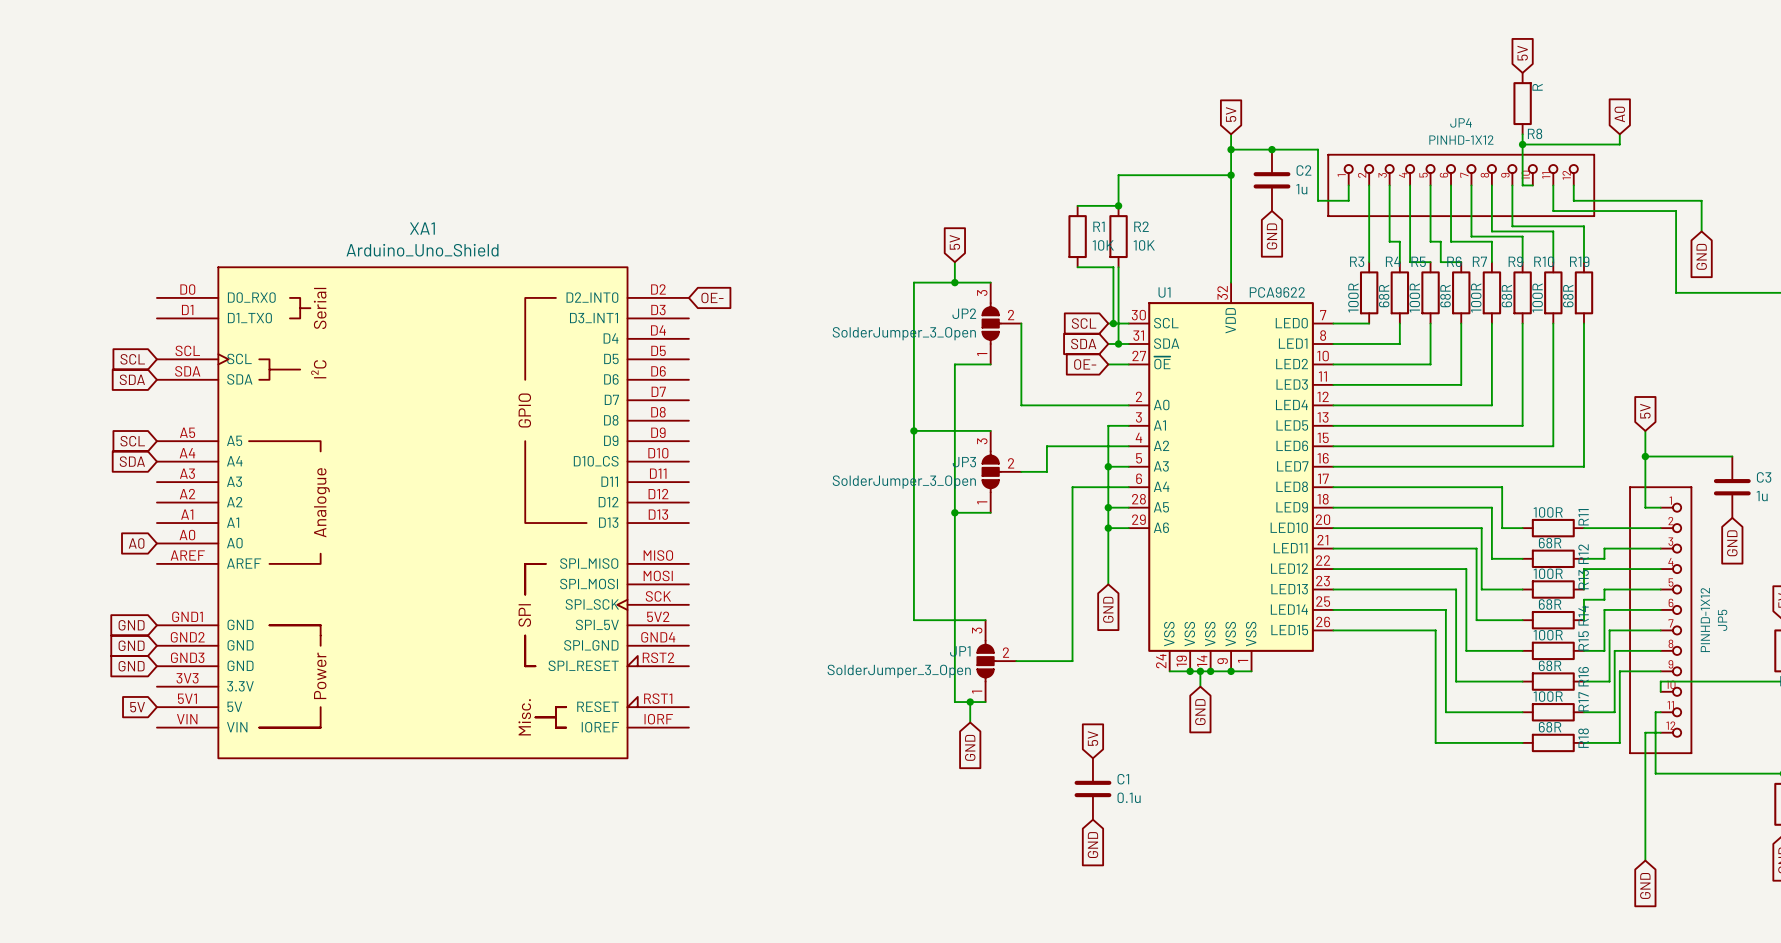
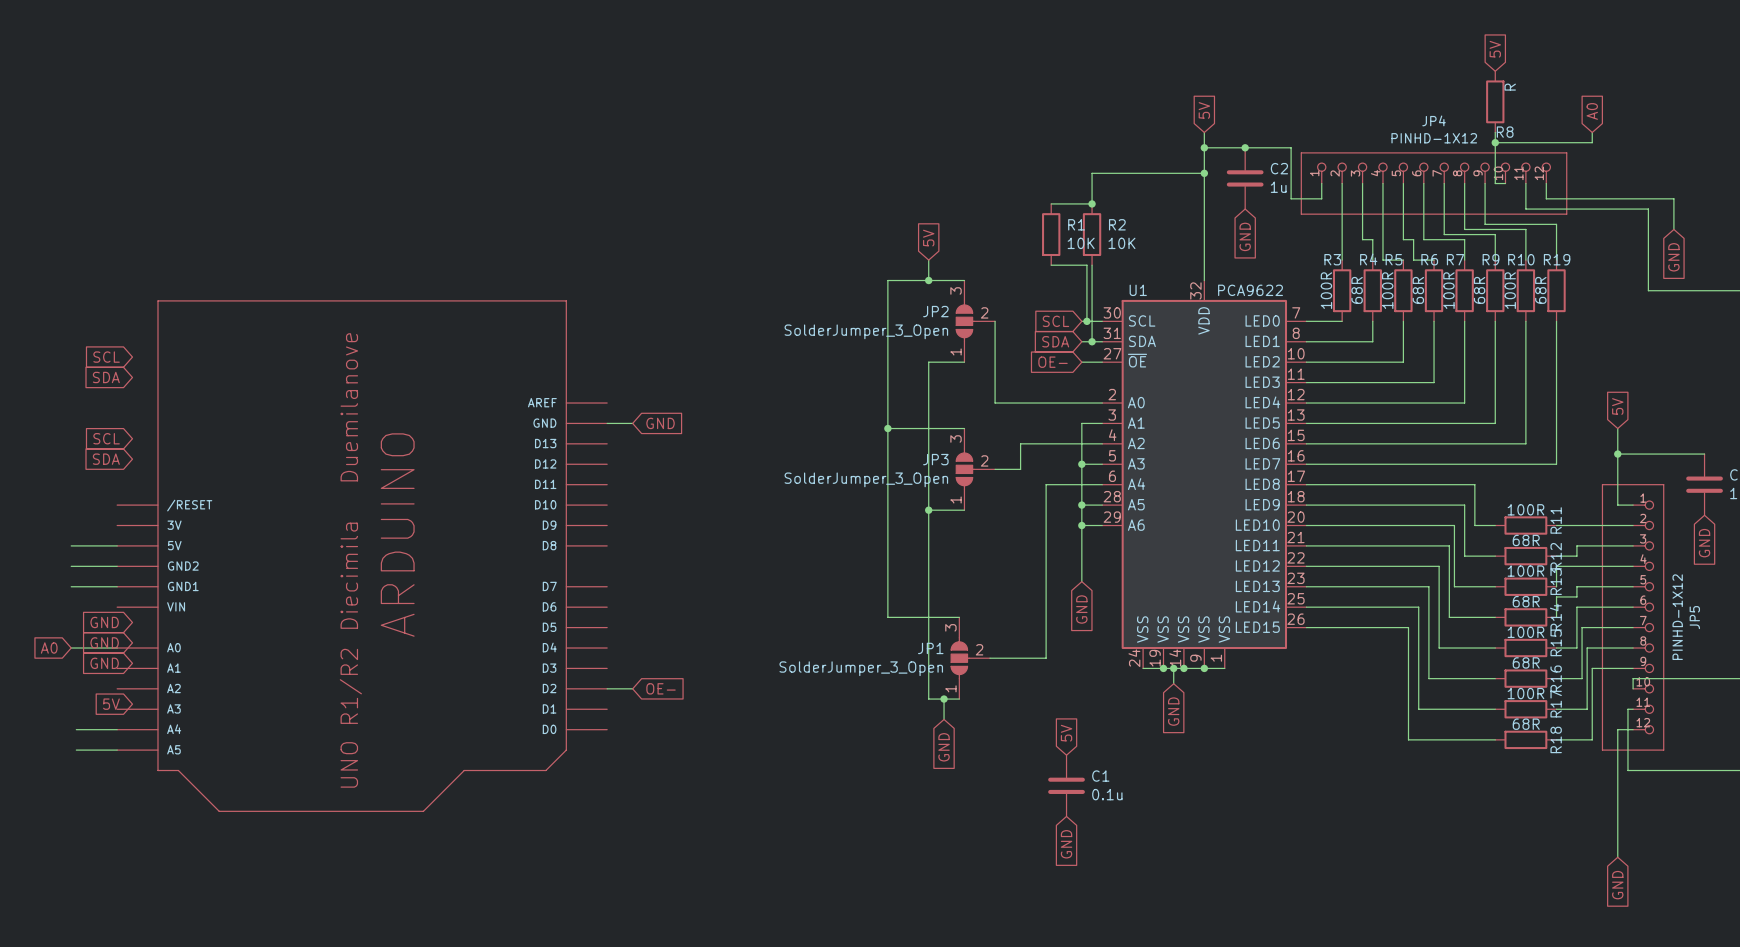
global label: OE- (712, 297) -> none
wire: none -> (607, 423) (632, 423)
global label: none -> GND (660, 423)
XA1: Arduino_Uno_Shield (422, 512) -> none
global label position: A0 (136, 543) -> A0 (49, 648)
wire: none -> (71, 545) (117, 545)
part: none -> (362, 556)
wire: none -> (71, 566) (117, 566)
wire: none -> (71, 586) (117, 586)
wire: none -> (71, 648) (117, 648)
wire: none -> (607, 688) (632, 688)
global label: none -> OE- (661, 688)
wire: none -> (76, 729) (117, 729)
wire: none -> (76, 750) (117, 750)

